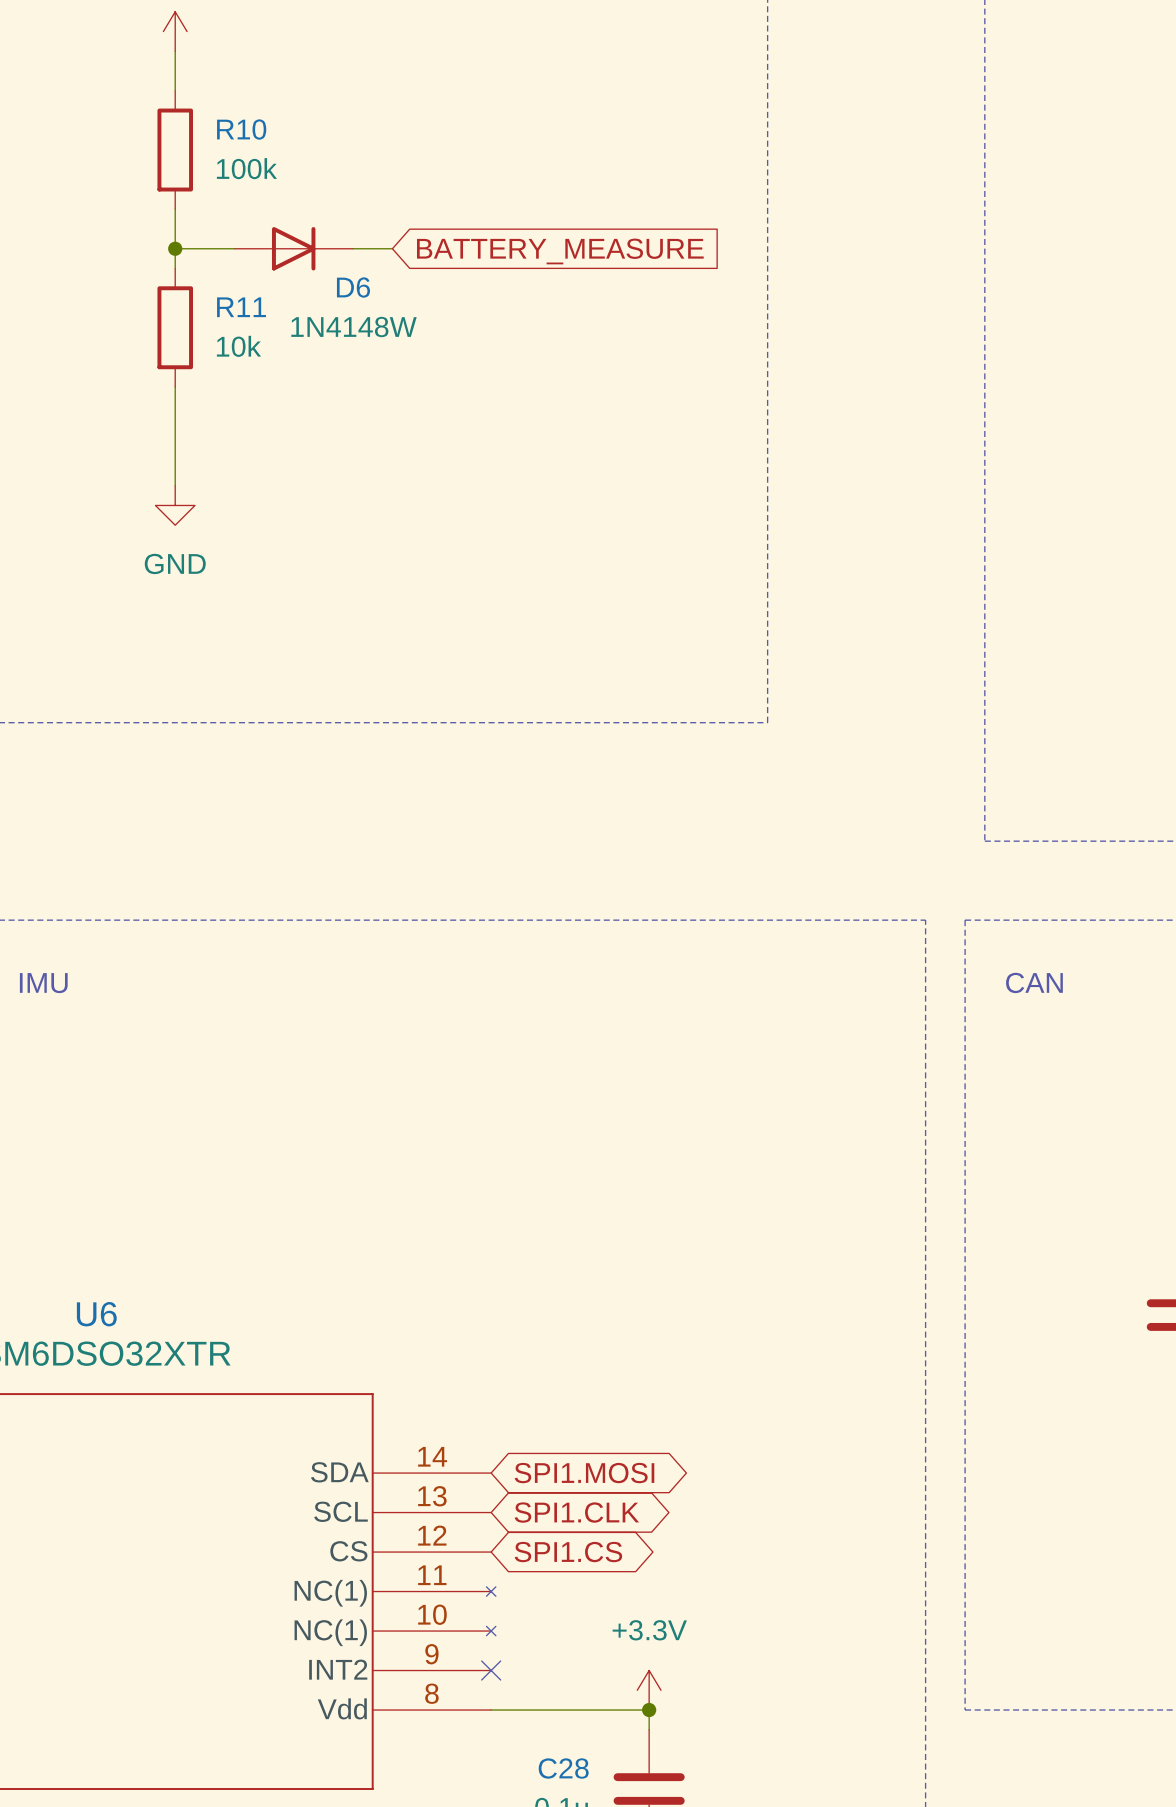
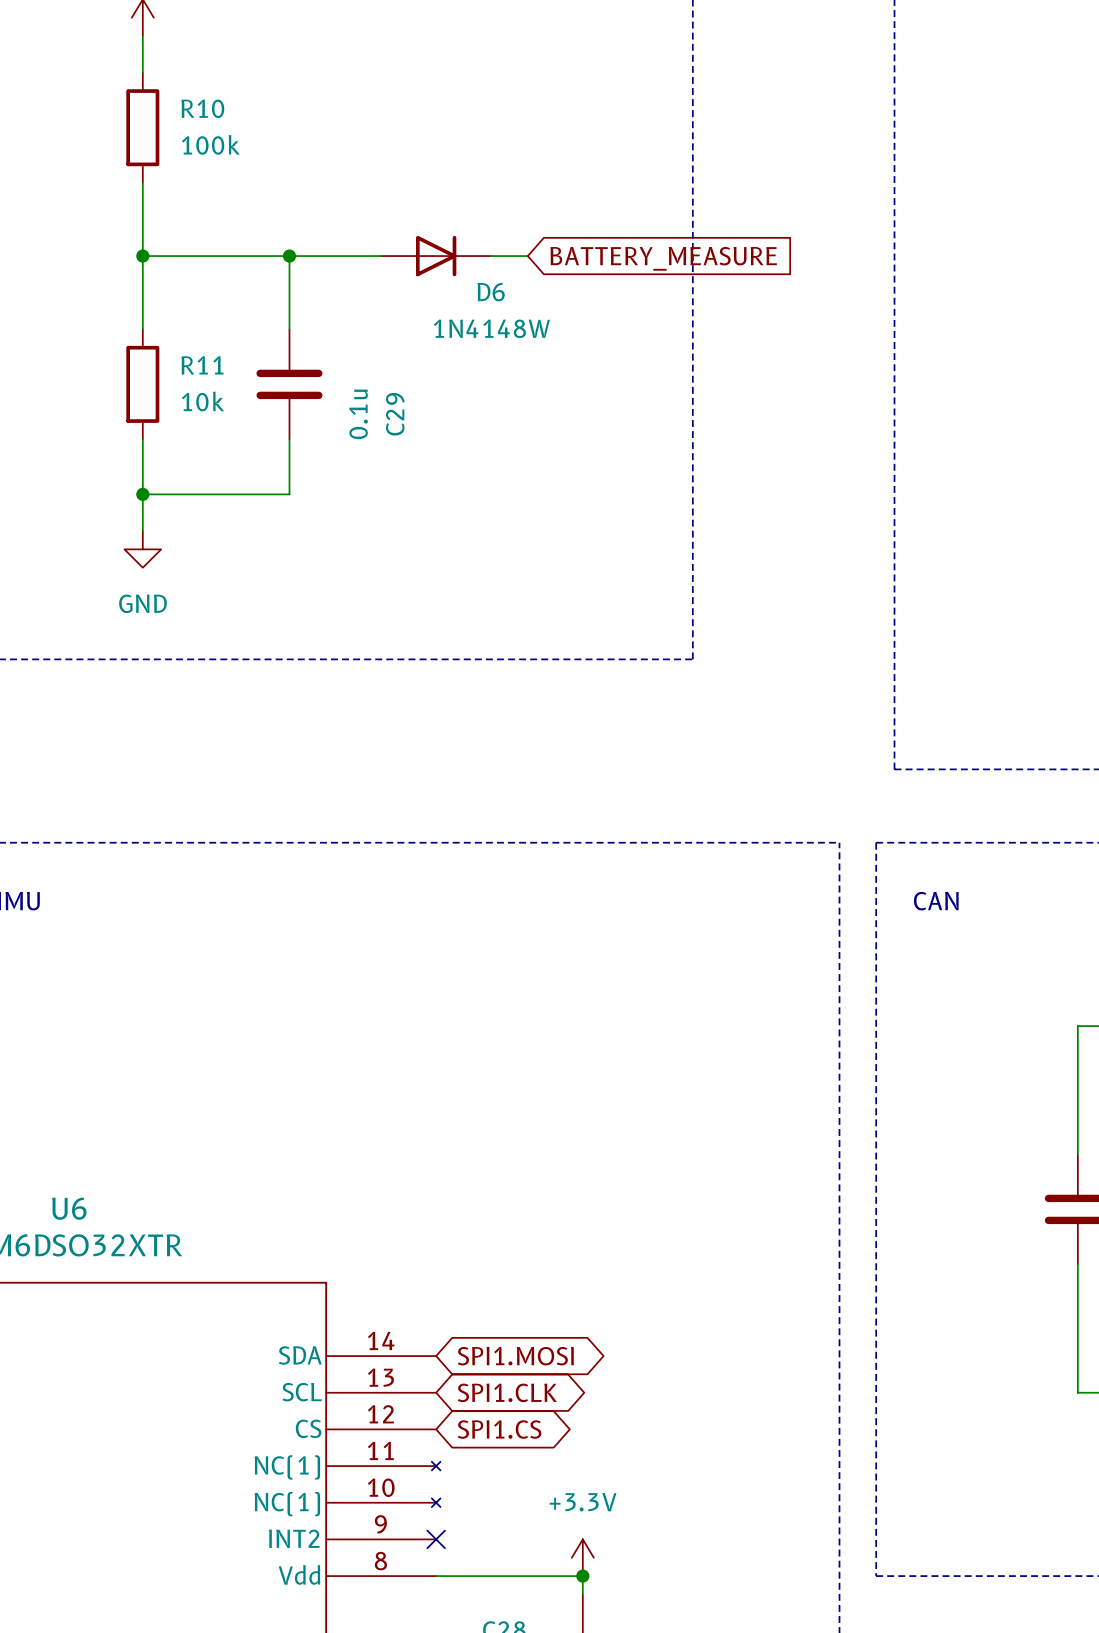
wire: (175, 248) (234, 248) -> none
junction position: (175, 248) -> (142, 256)
D6 position: (293, 248) -> (436, 256)
wire: (352, 248) (392, 248) -> (491, 256) (527, 256)
global label position: BATTERY_MEASURE (560, 251) -> BATTERY_MEASURE (663, 258)
wire: none -> (142, 237) (142, 329)
wire: none -> (142, 256) (381, 256)
wire: none -> (289, 256) (289, 329)
junction: none -> (289, 256)
R11 position: (175, 327) -> (142, 384)
wire: (175, 386) (175, 485) -> (142, 531) (142, 439)
C29: none -> 0.1u (289, 384)
wire: none -> (289, 439) (289, 494) (142, 494)
power symbol position: GND (175, 505) -> GND (142, 549)
junction: none -> (142, 494)

